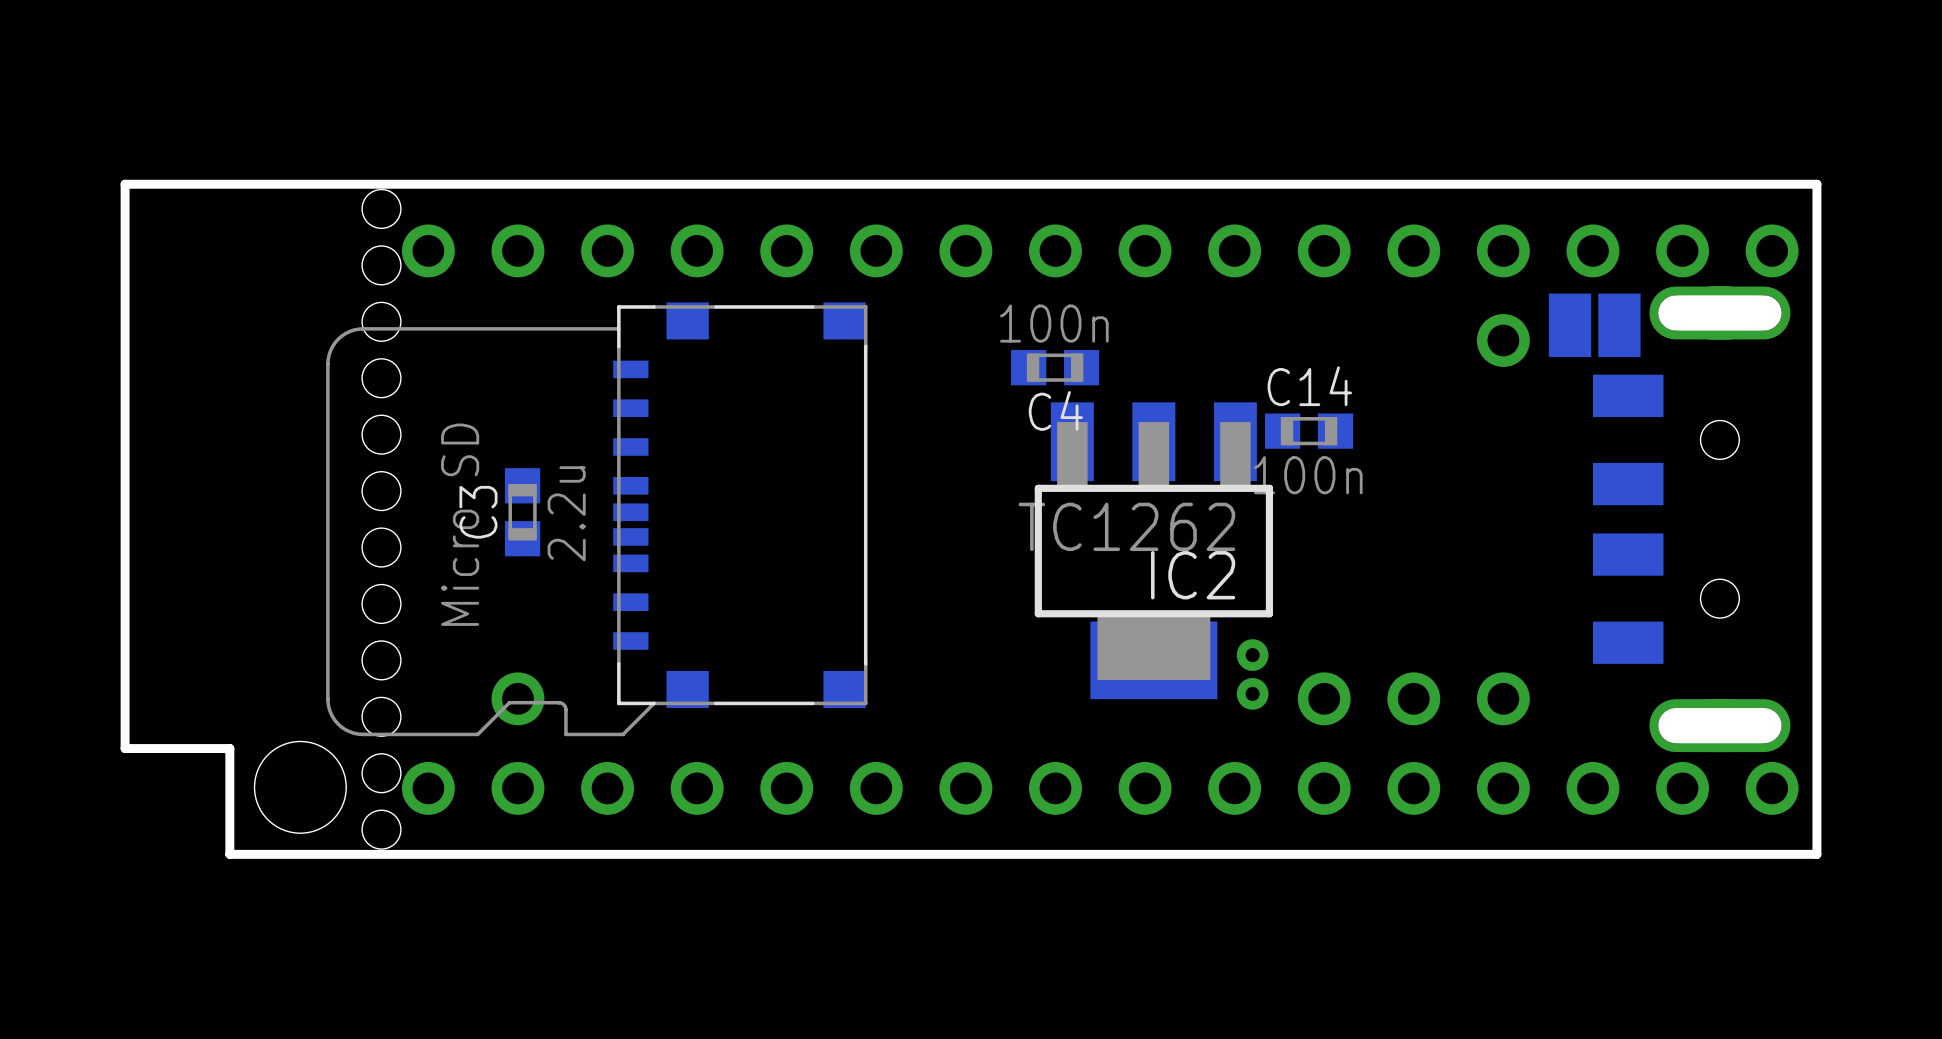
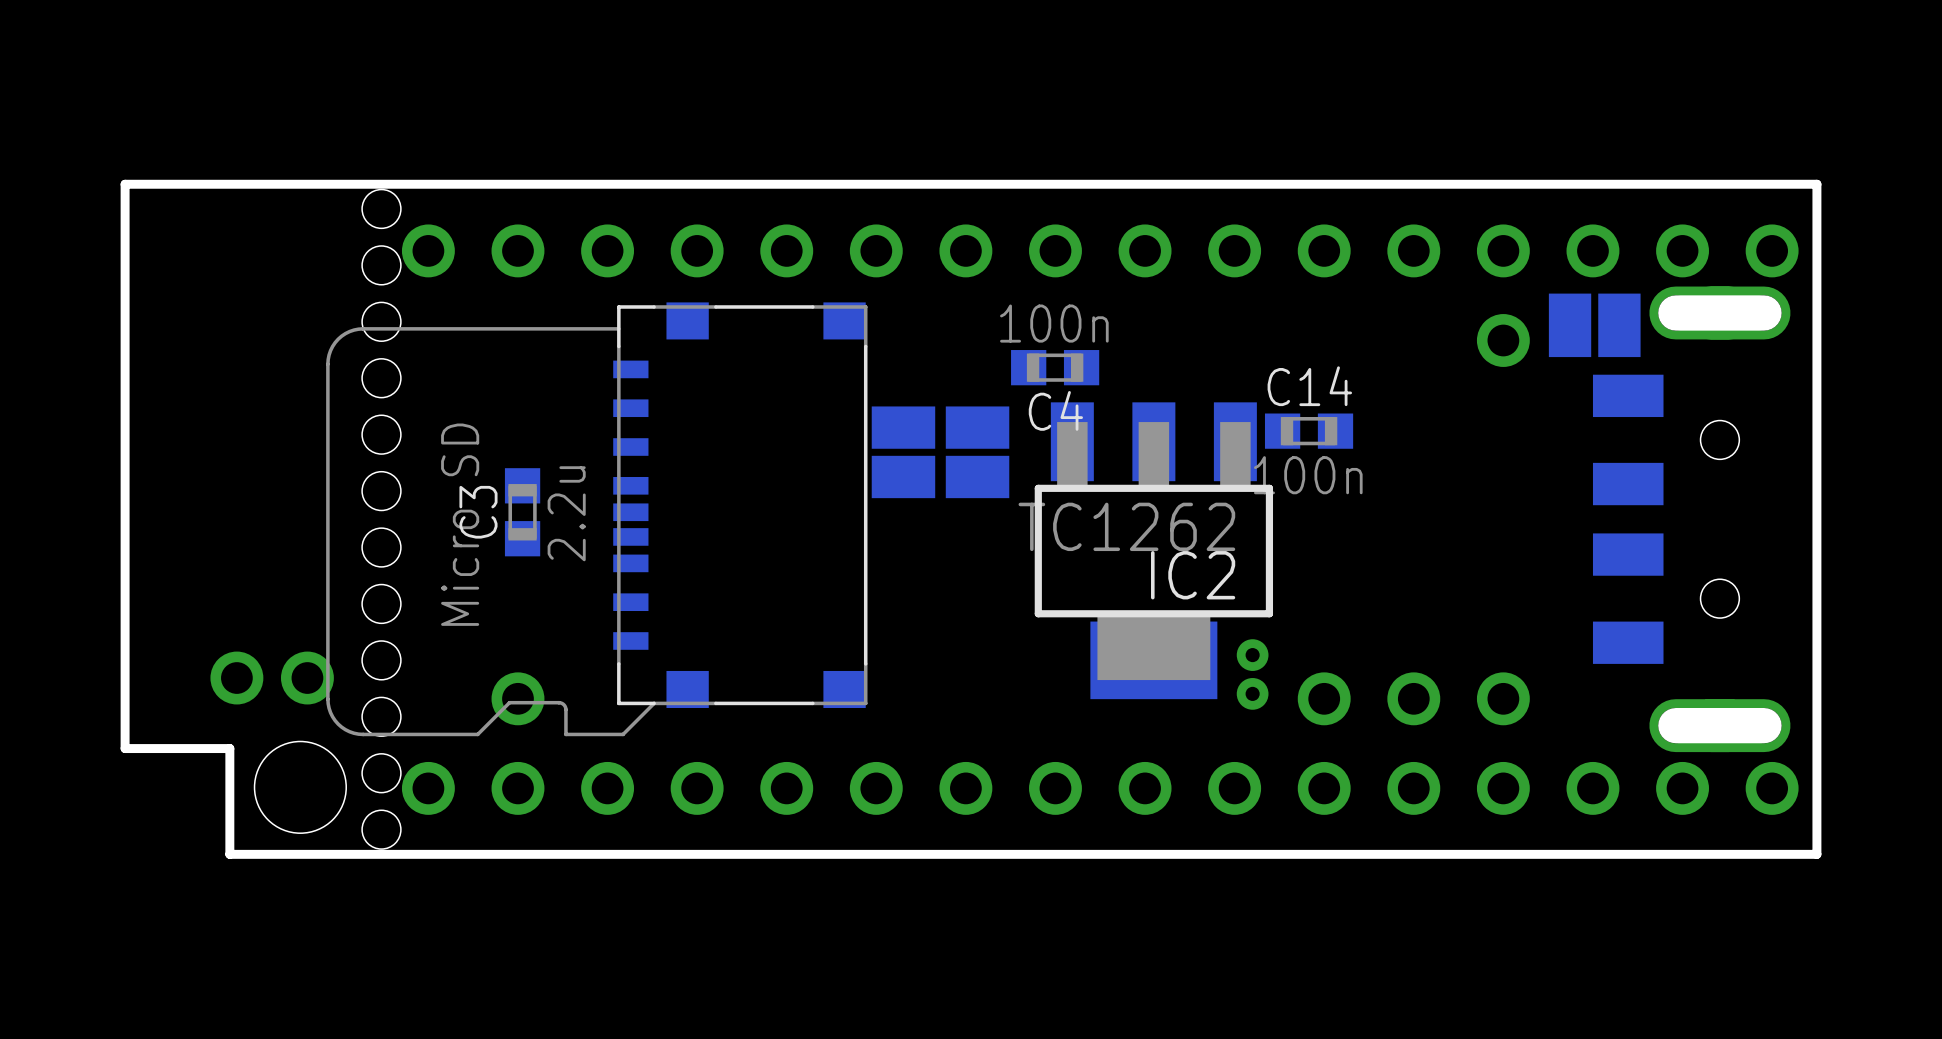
part: none -> (903, 452)
part: none -> (977, 452)
part: none -> (236, 678)
part: none -> (307, 678)

